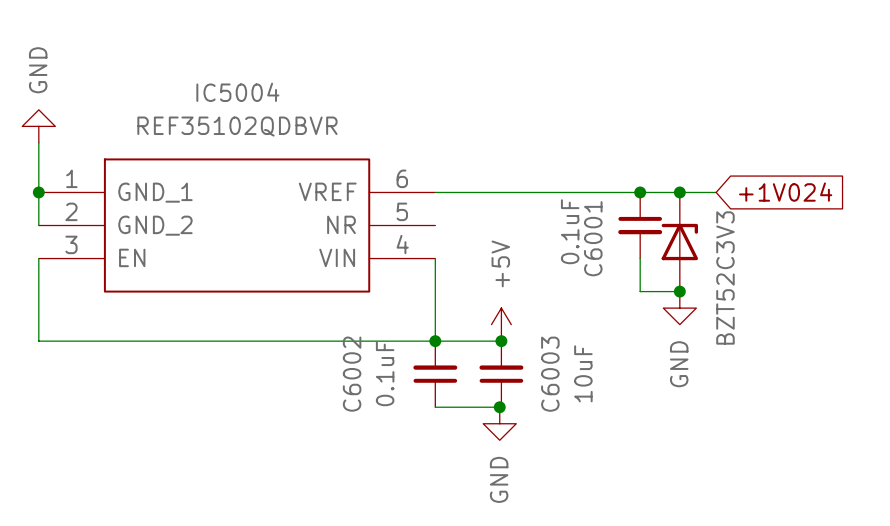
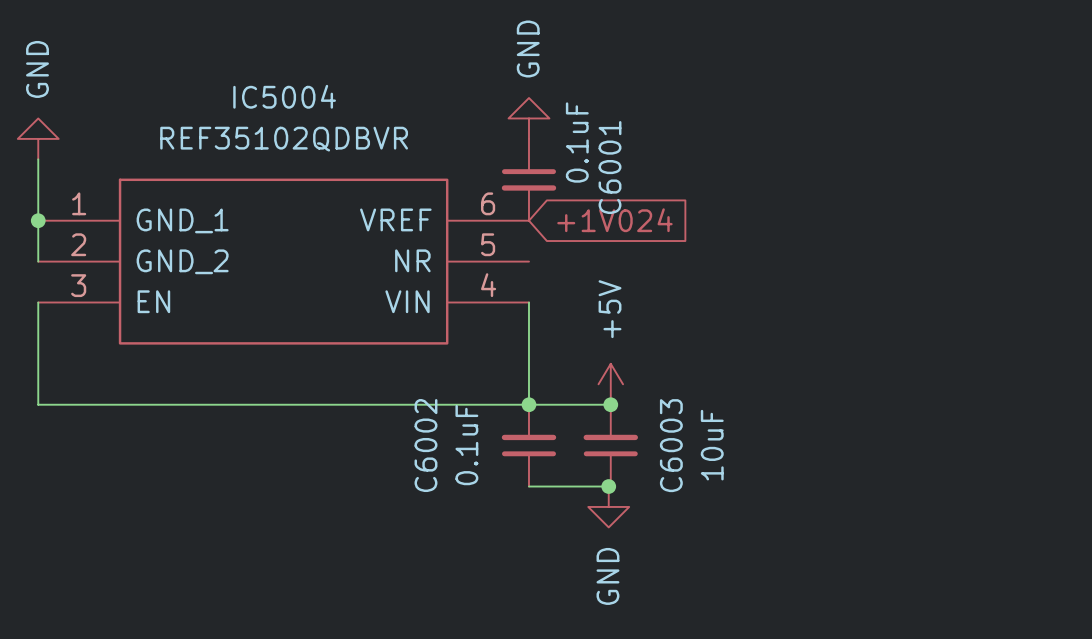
wire: (435, 192) (716, 192) -> none
junction: (640, 192) -> none
junction: (679, 192) -> none
global label position: +1V024 (785, 192) -> +1V024 (614, 220)
C6001 position: (640, 225) -> (528, 179)
C6001 value position: 0.1uF (570, 231) -> 0.1uF (577, 142)
C6001 name position: C6001 (593, 238) -> C6001 (610, 167)
part: BZT52C3V3 (679, 242) -> none
wire: (640, 258) (640, 291) (679, 291) -> none
junction: (679, 291) -> none
power symbol rotation: 0° (679, 308) -> 180° (528, 118)
power symbol position: GND (679, 308) -> GND (528, 118)

